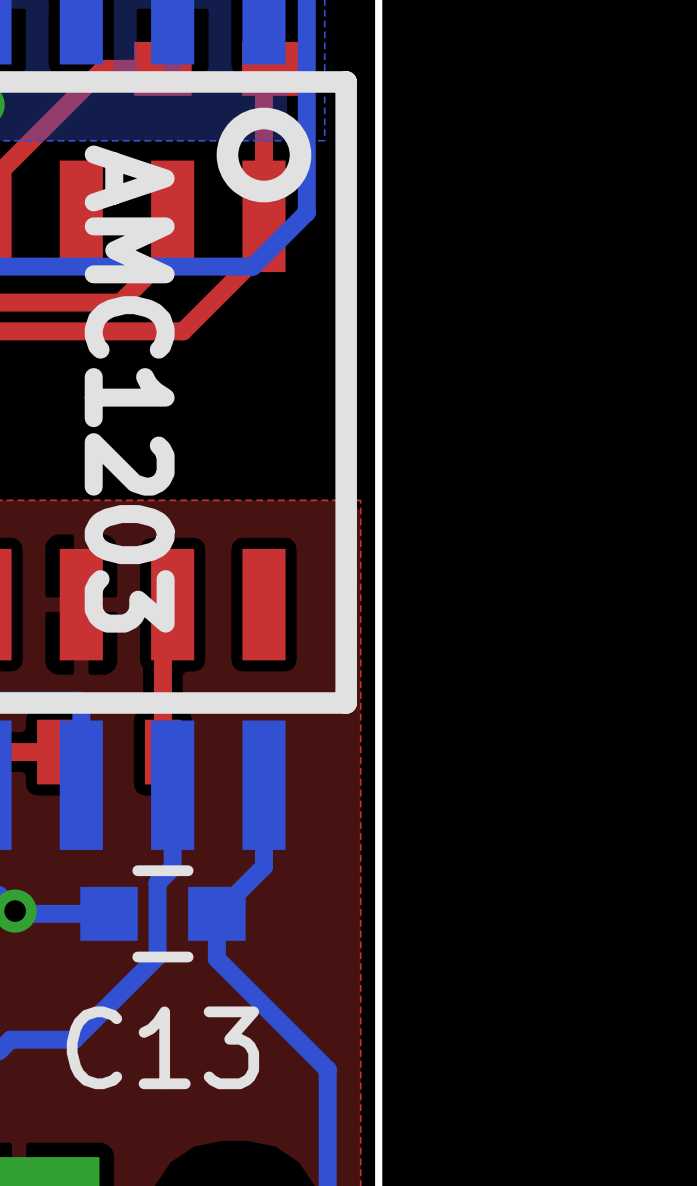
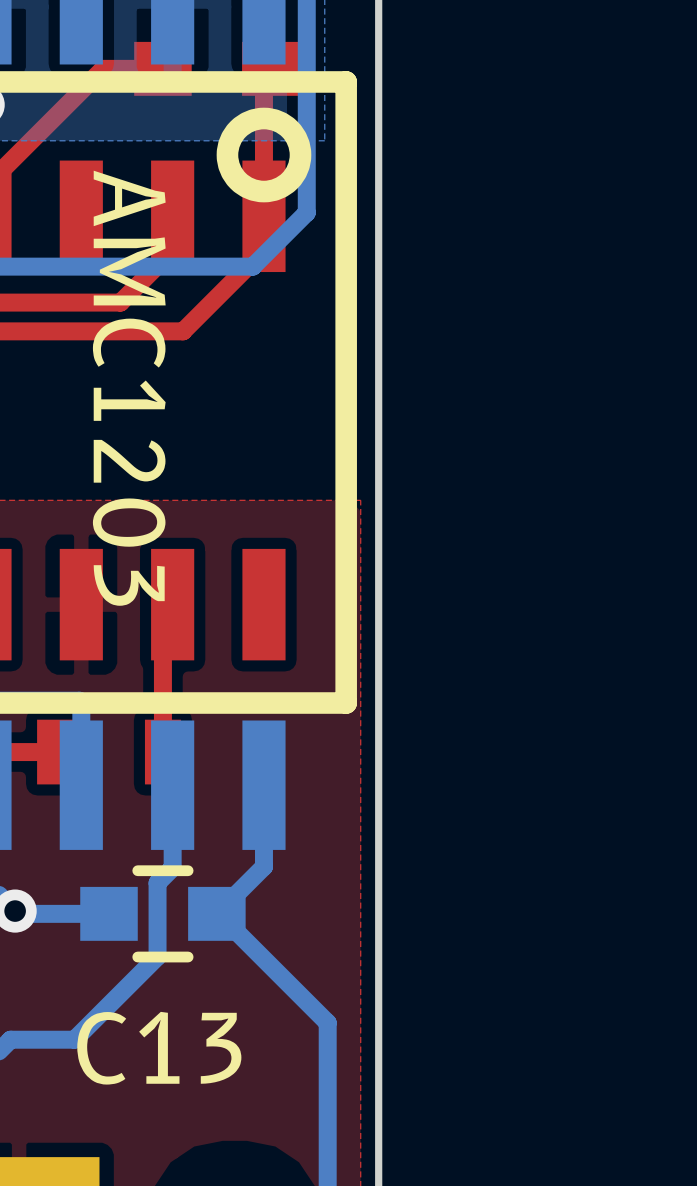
bottom track: (216, 913) (216, 958) (327, 1069) -> (216, 913) (327, 1022) (327, 1069)

